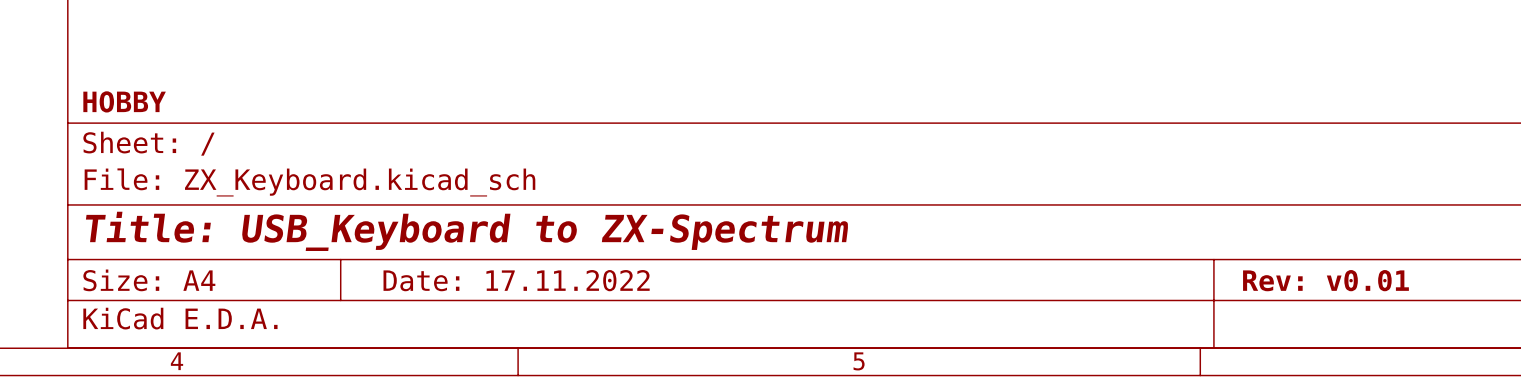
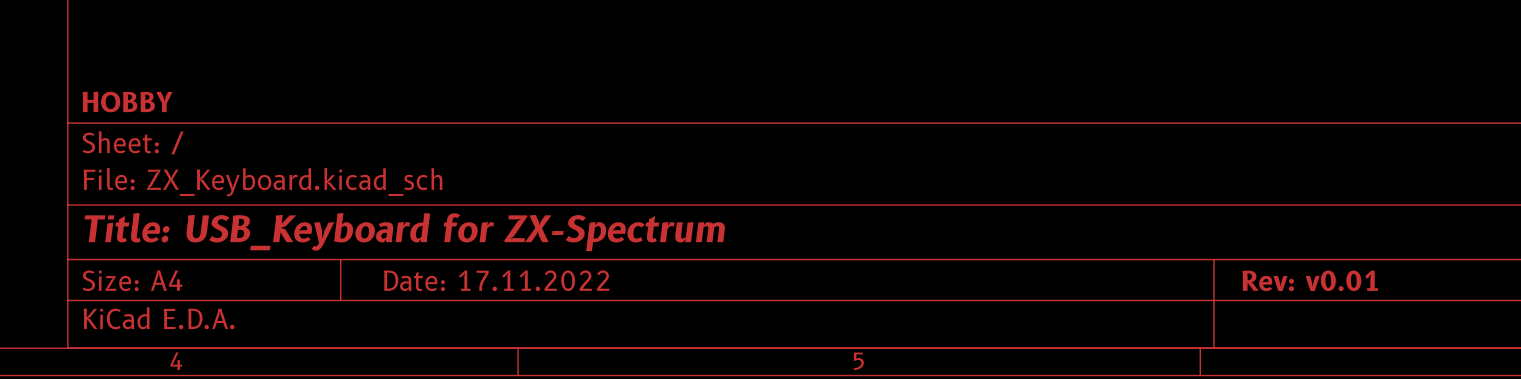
title block: Title: USB_Keyboard to ZX-Spectrum (467, 231) -> Title: USB_Keyboard for ZX-Spectrum (404, 232)

